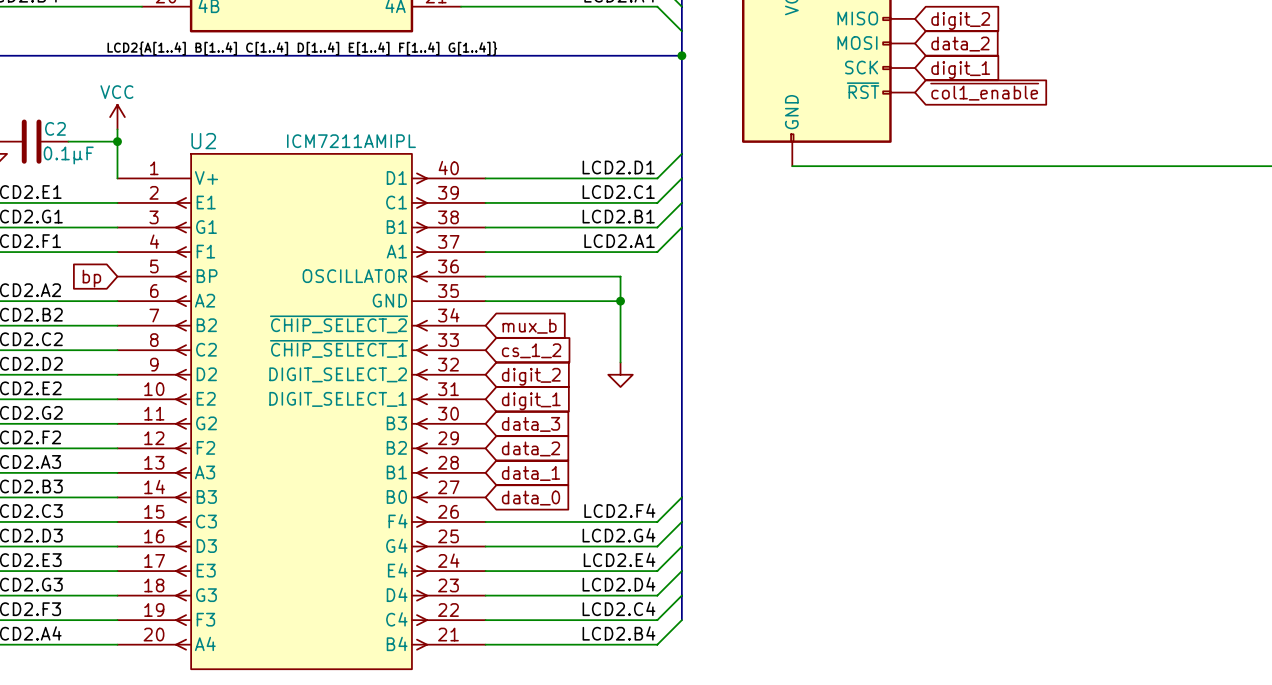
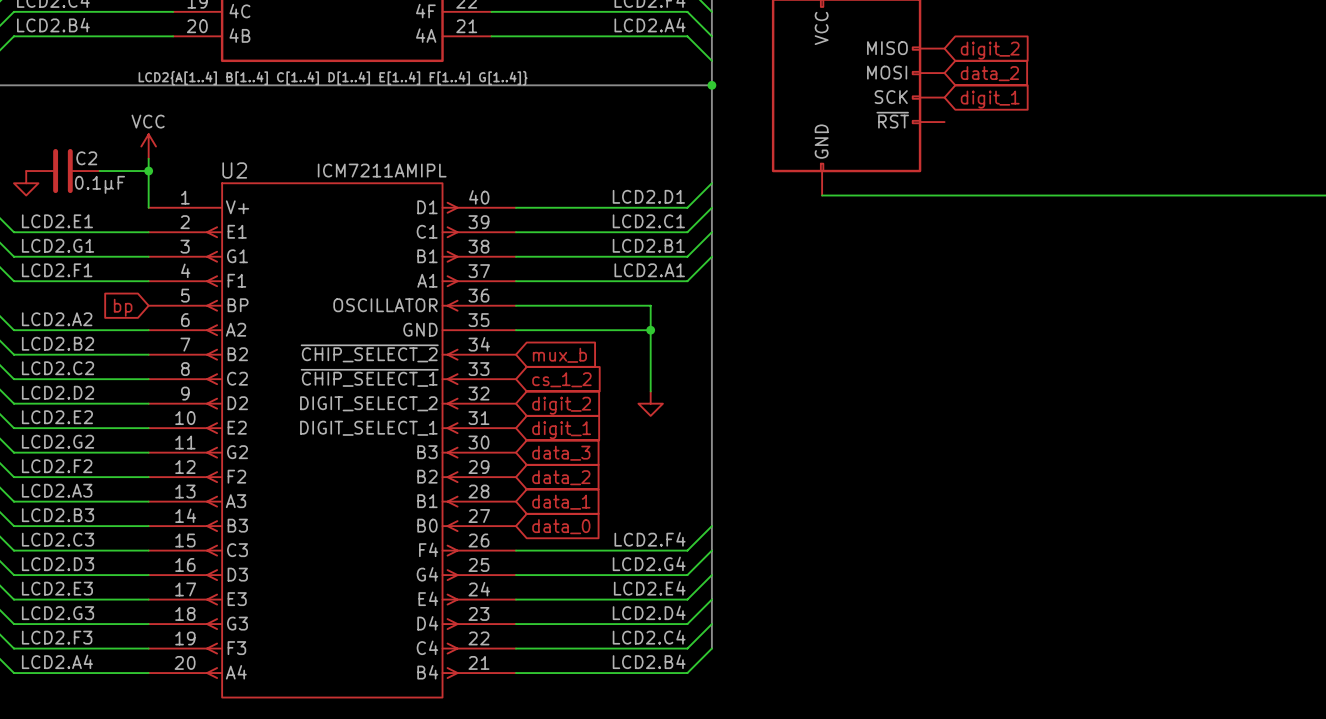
global label: ~{col1_enable} (984, 91) -> none

